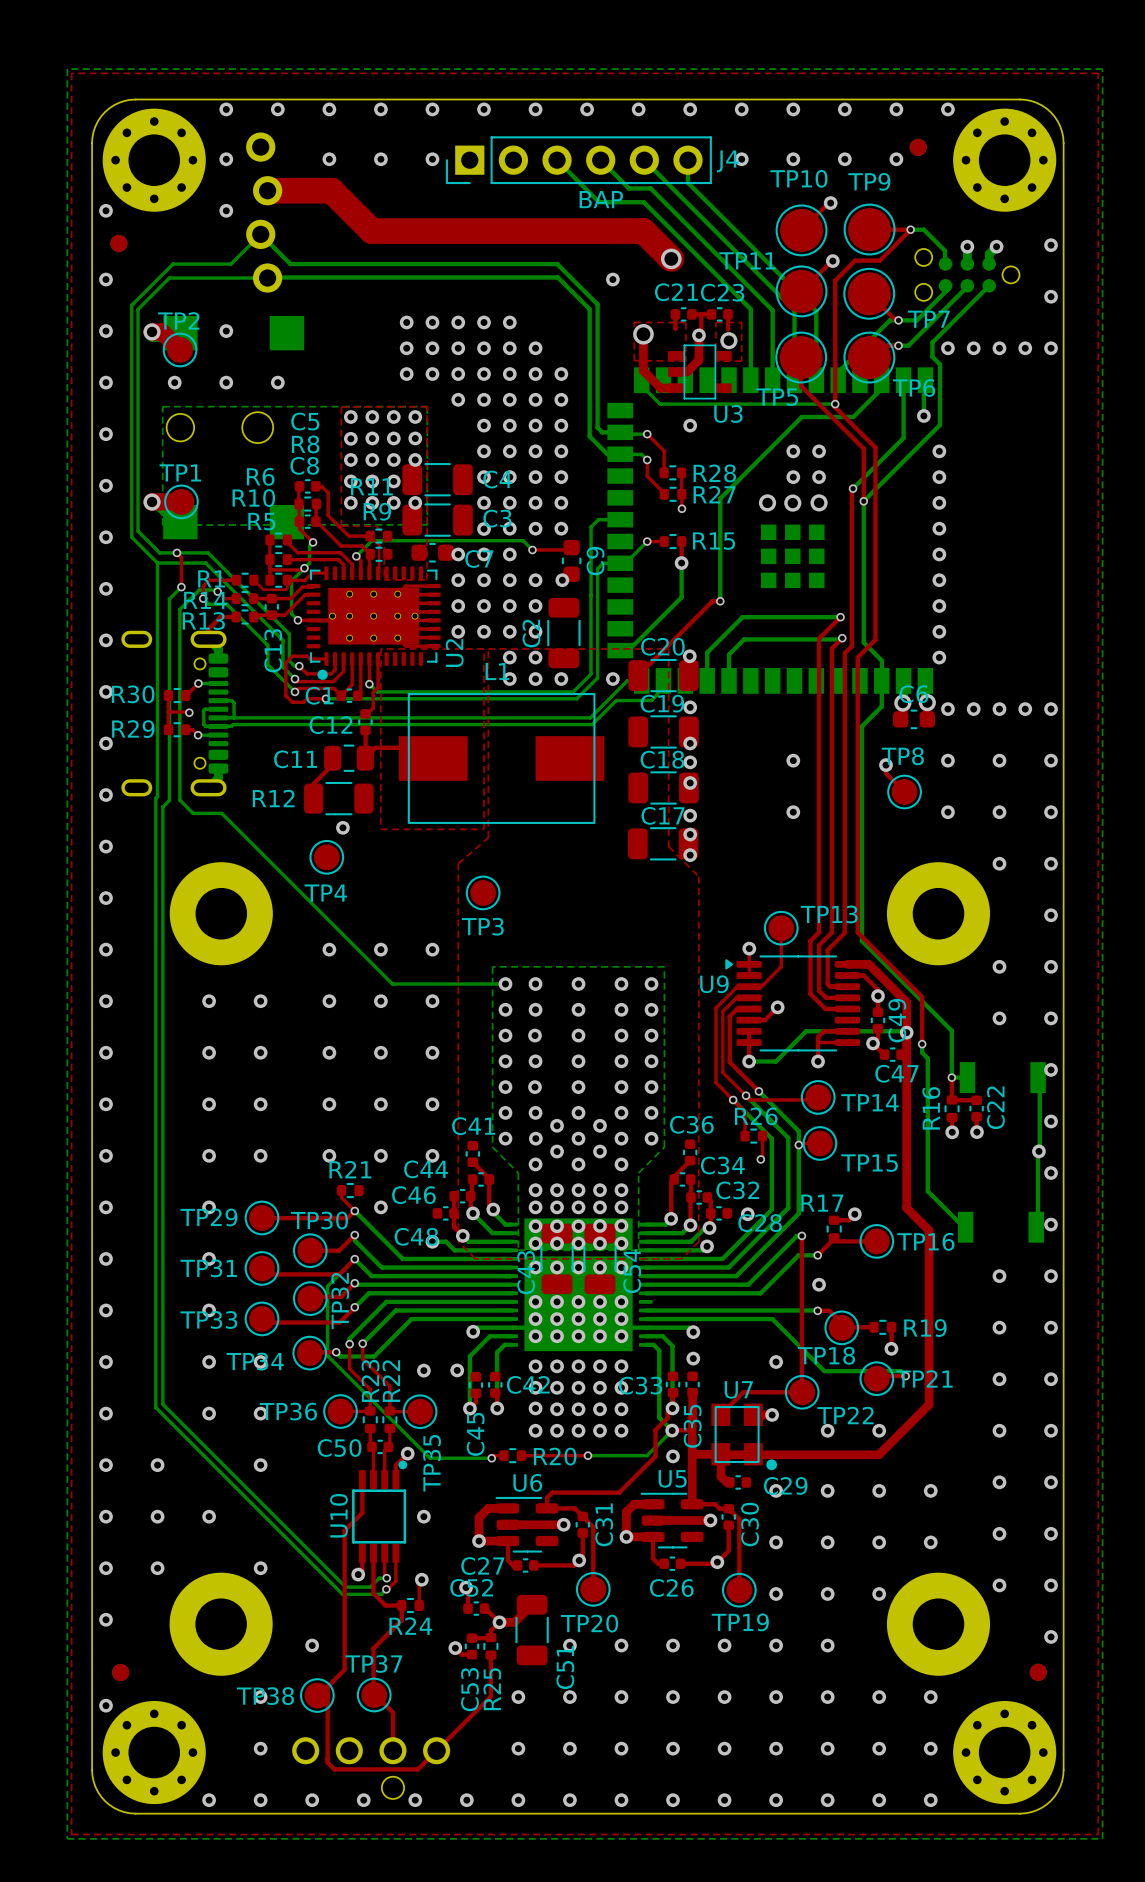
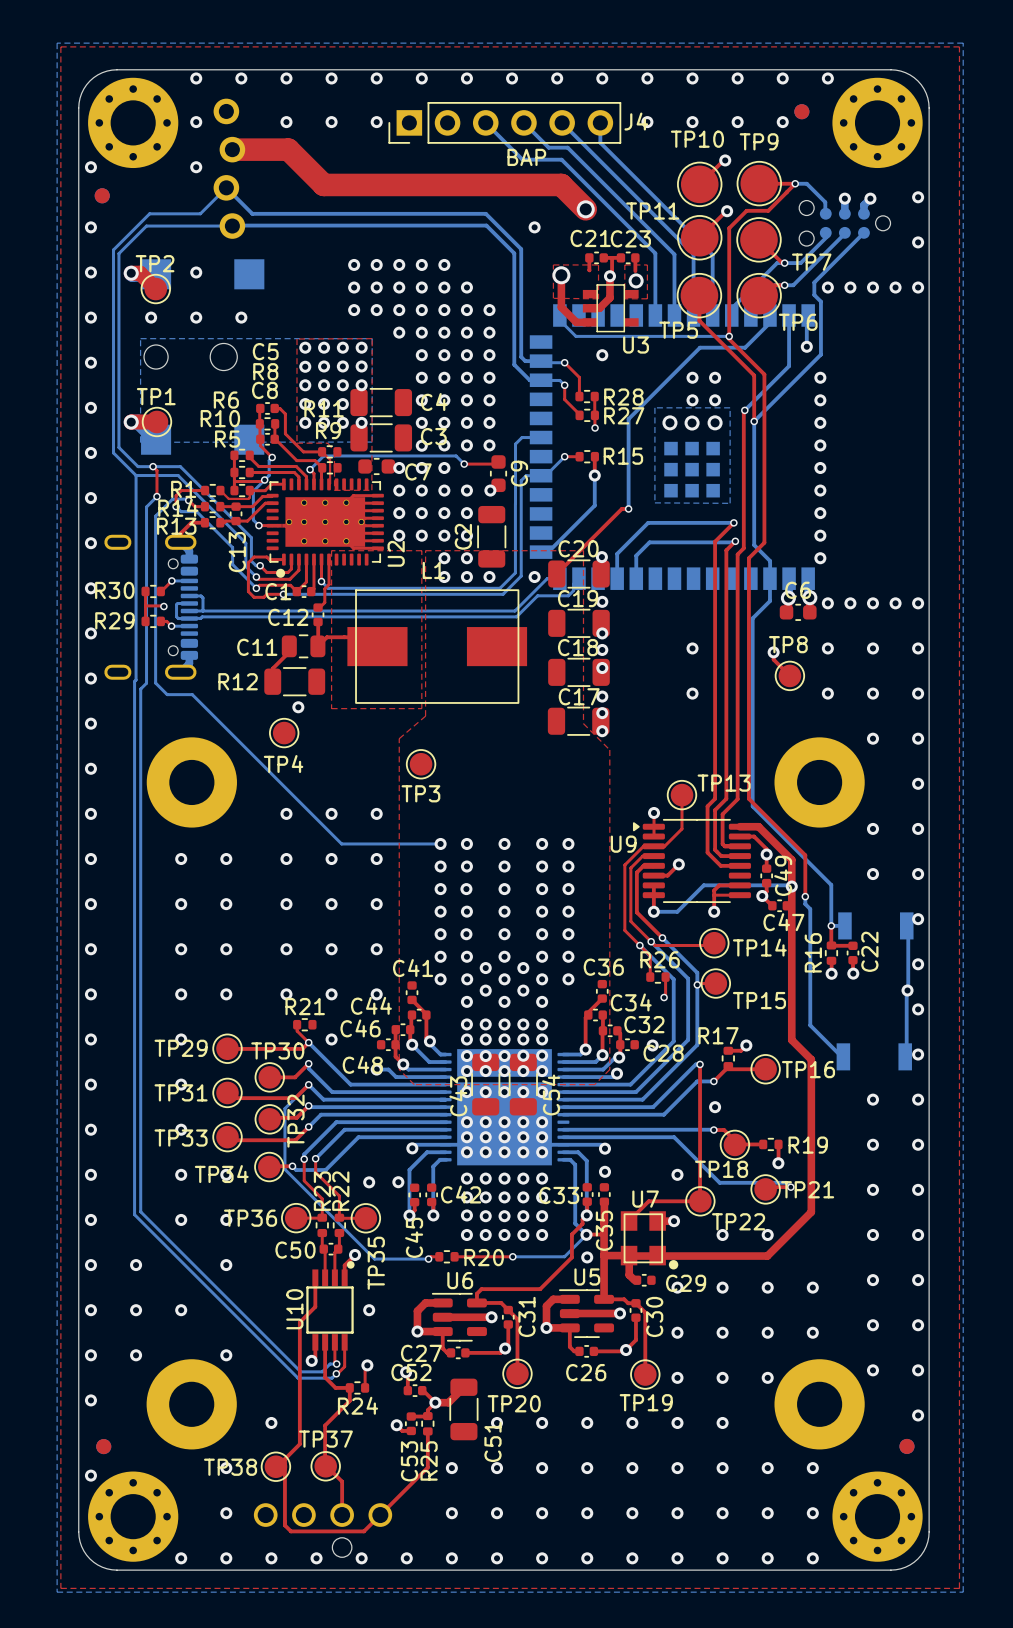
bottom zone outline: none -> (654, 407) (730, 407) (730, 503) (654, 502) (654, 407)
bottom zone outline: (492, 966) (664, 966) (664, 1147) (638, 1173) (638, 1250) (518, 1250) (518, 1173) (492, 1147) (492, 966) -> none

